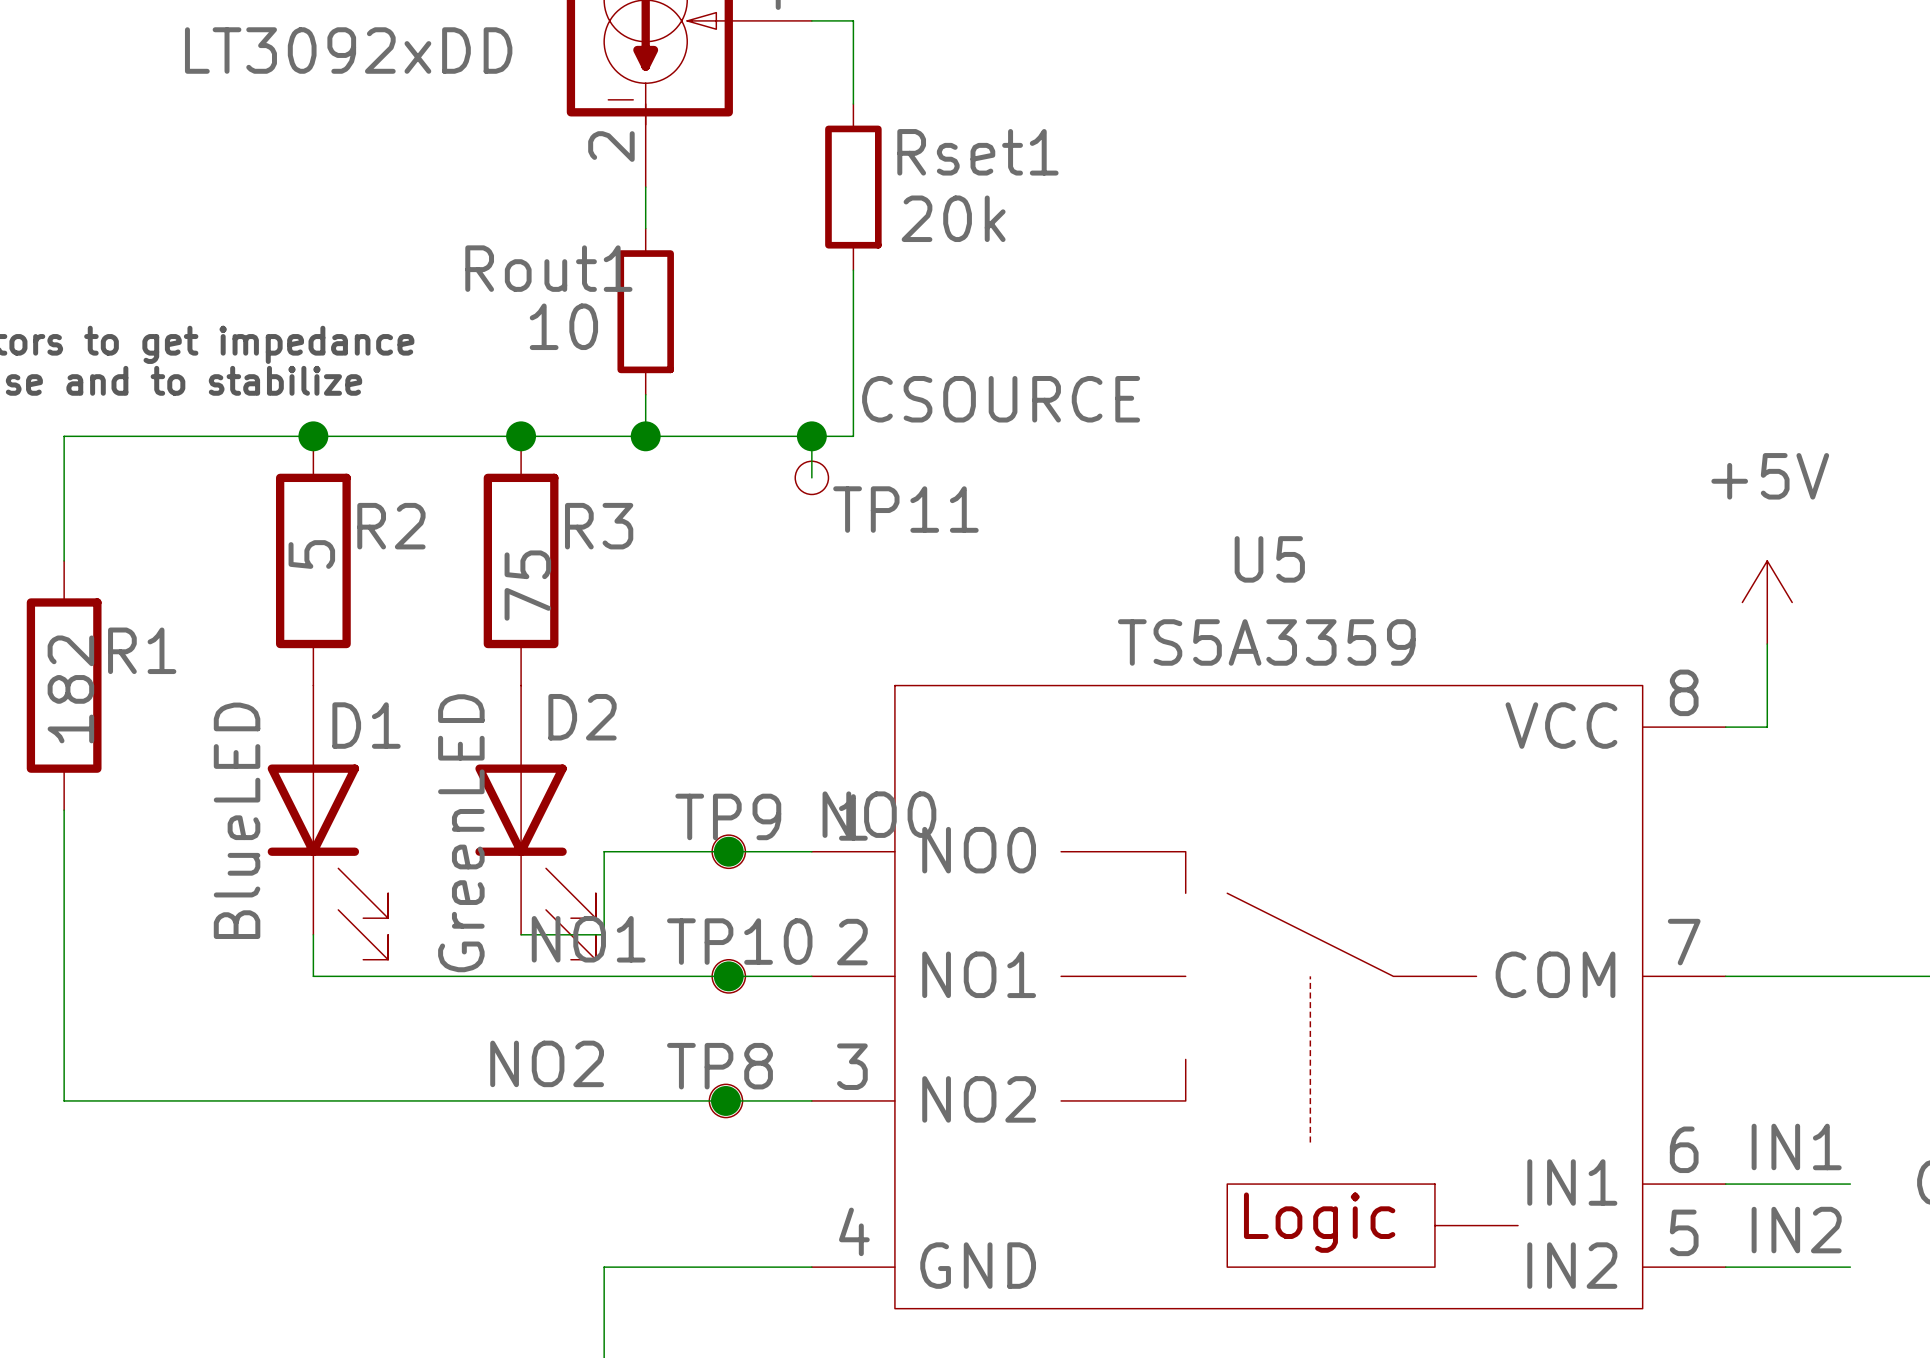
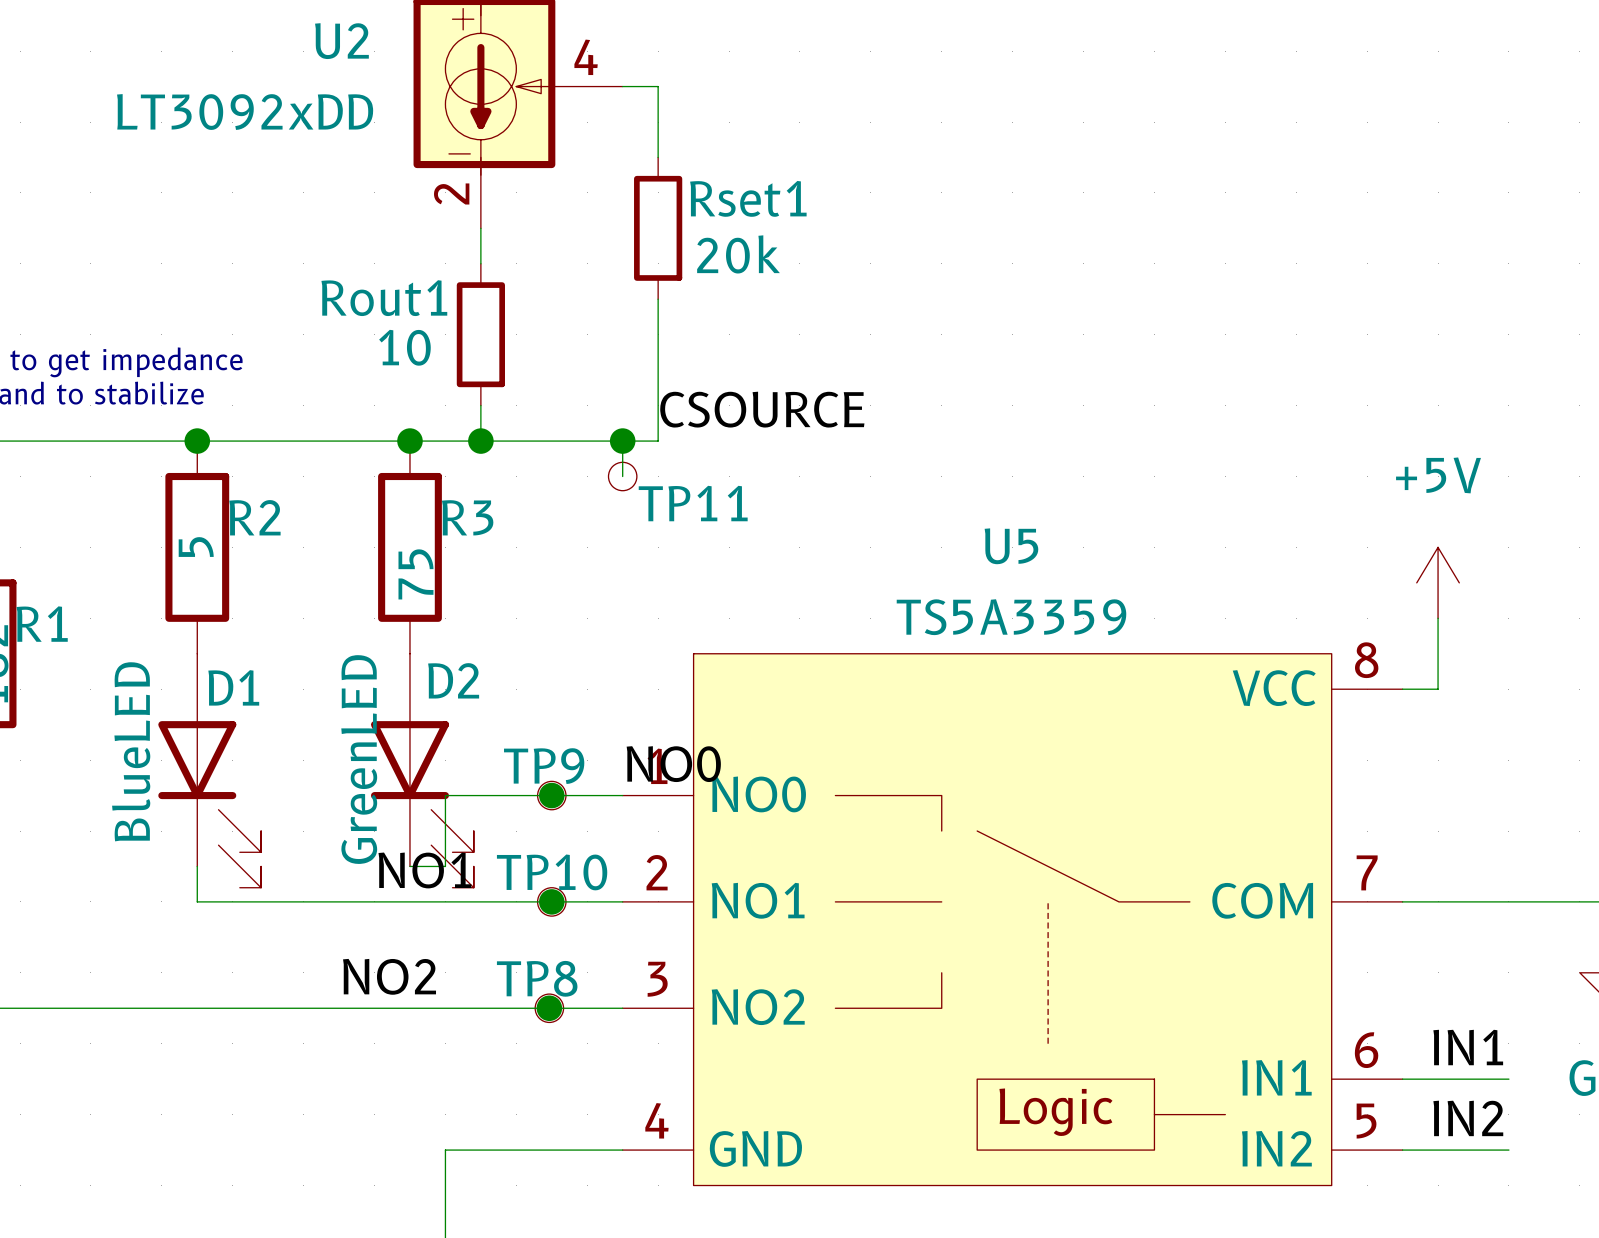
junction position: (521, 436) -> (409, 441)
R3 position: (521, 560) -> (409, 547)
D2 position: (535, 822) -> (422, 770)
wire: (521, 934) (562, 934) -> none

